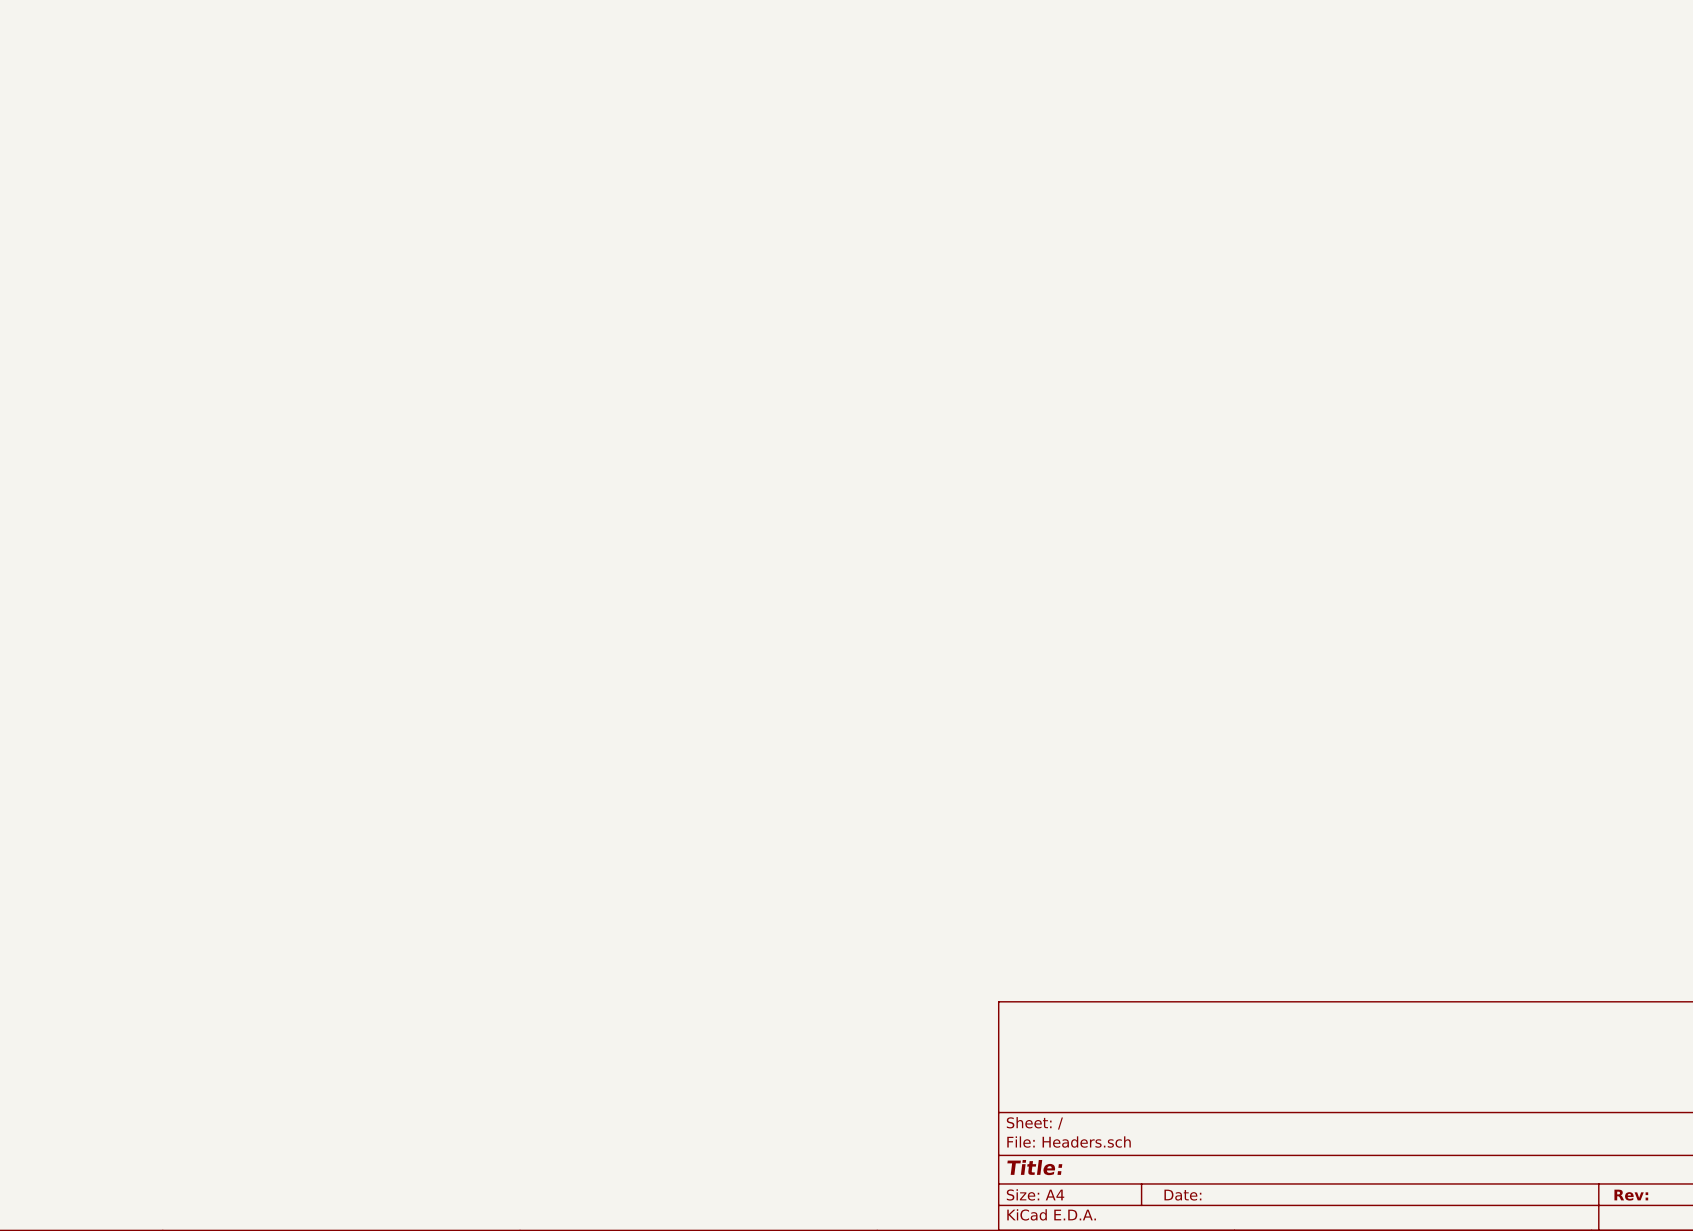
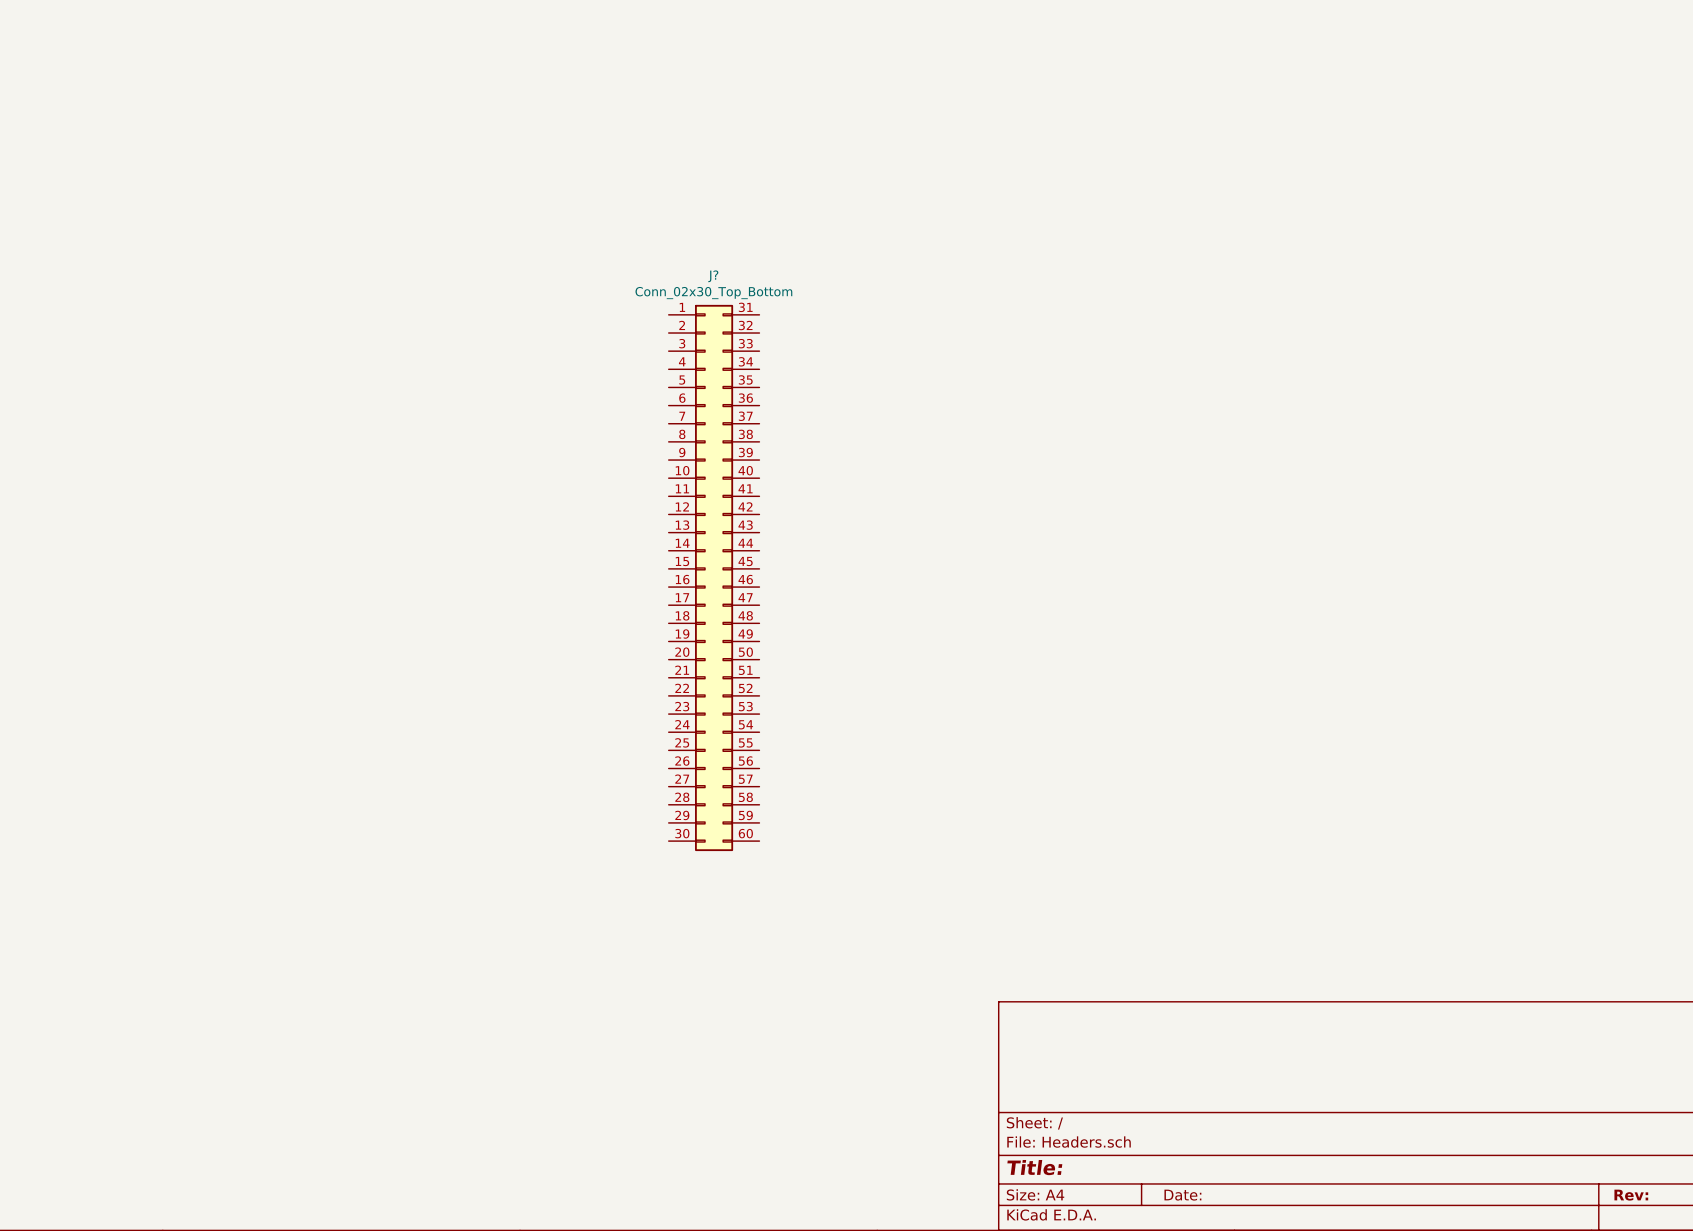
J?: none -> Conn_02x30_Top_Bottom (714, 577)

